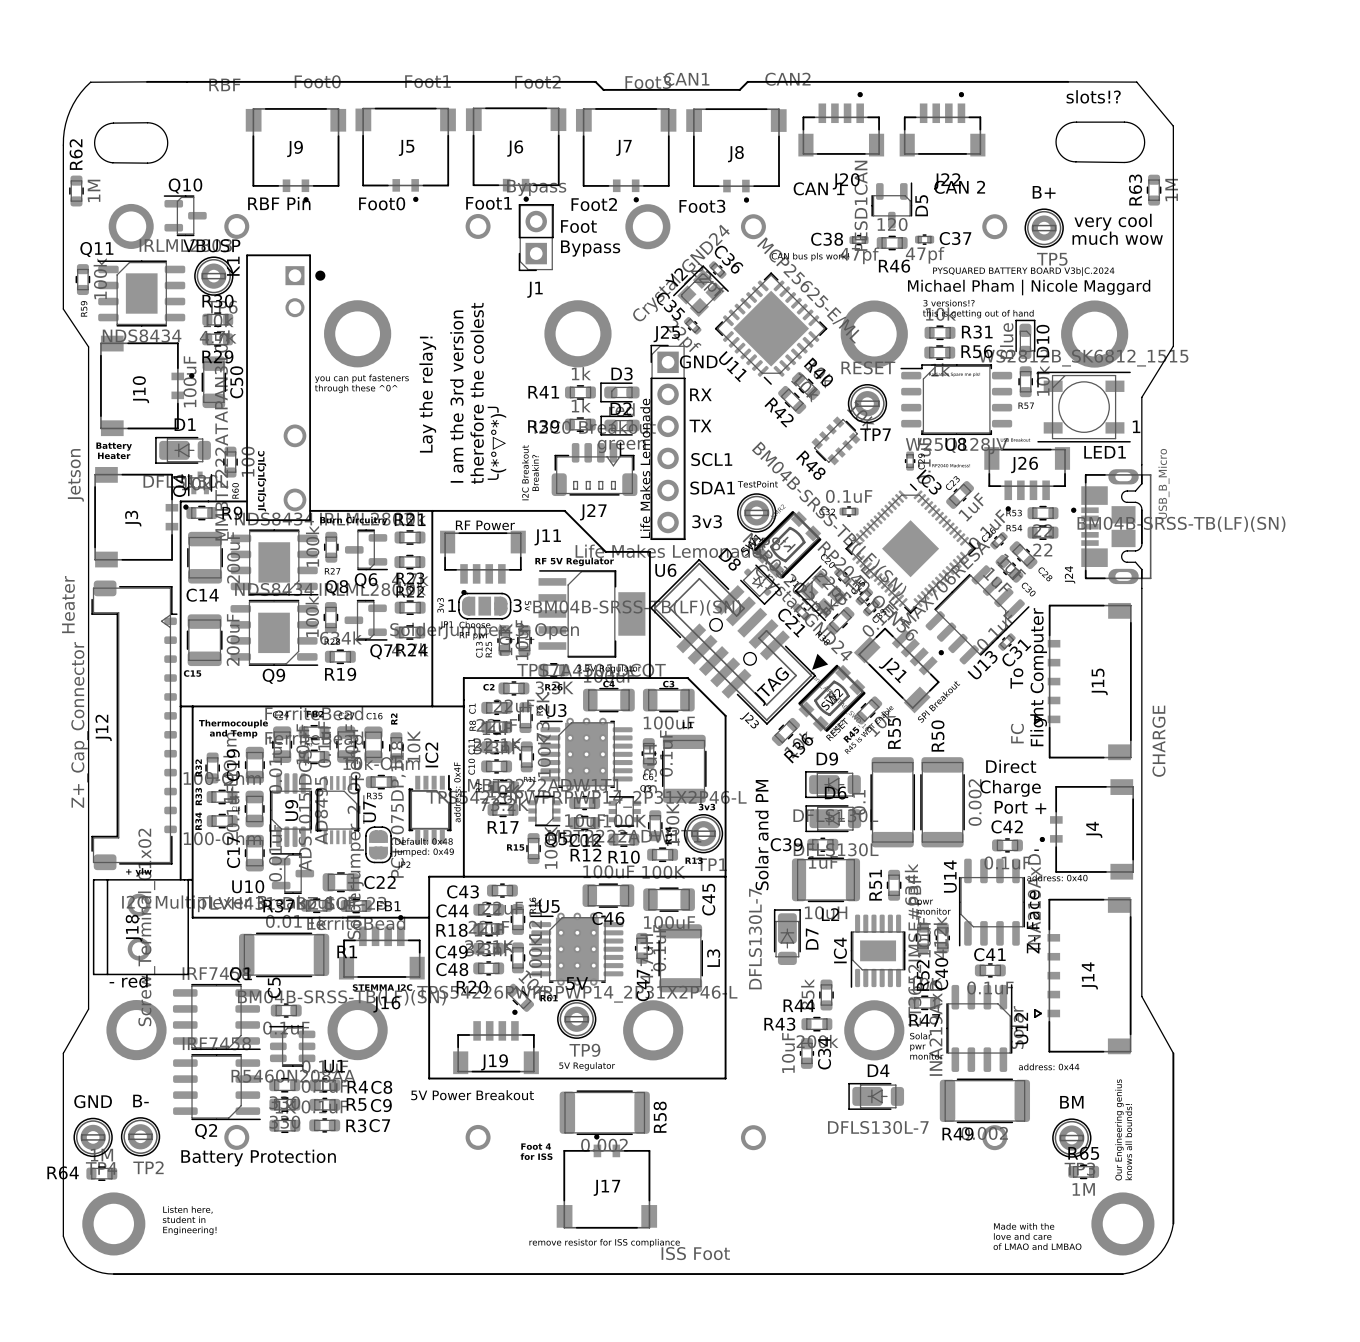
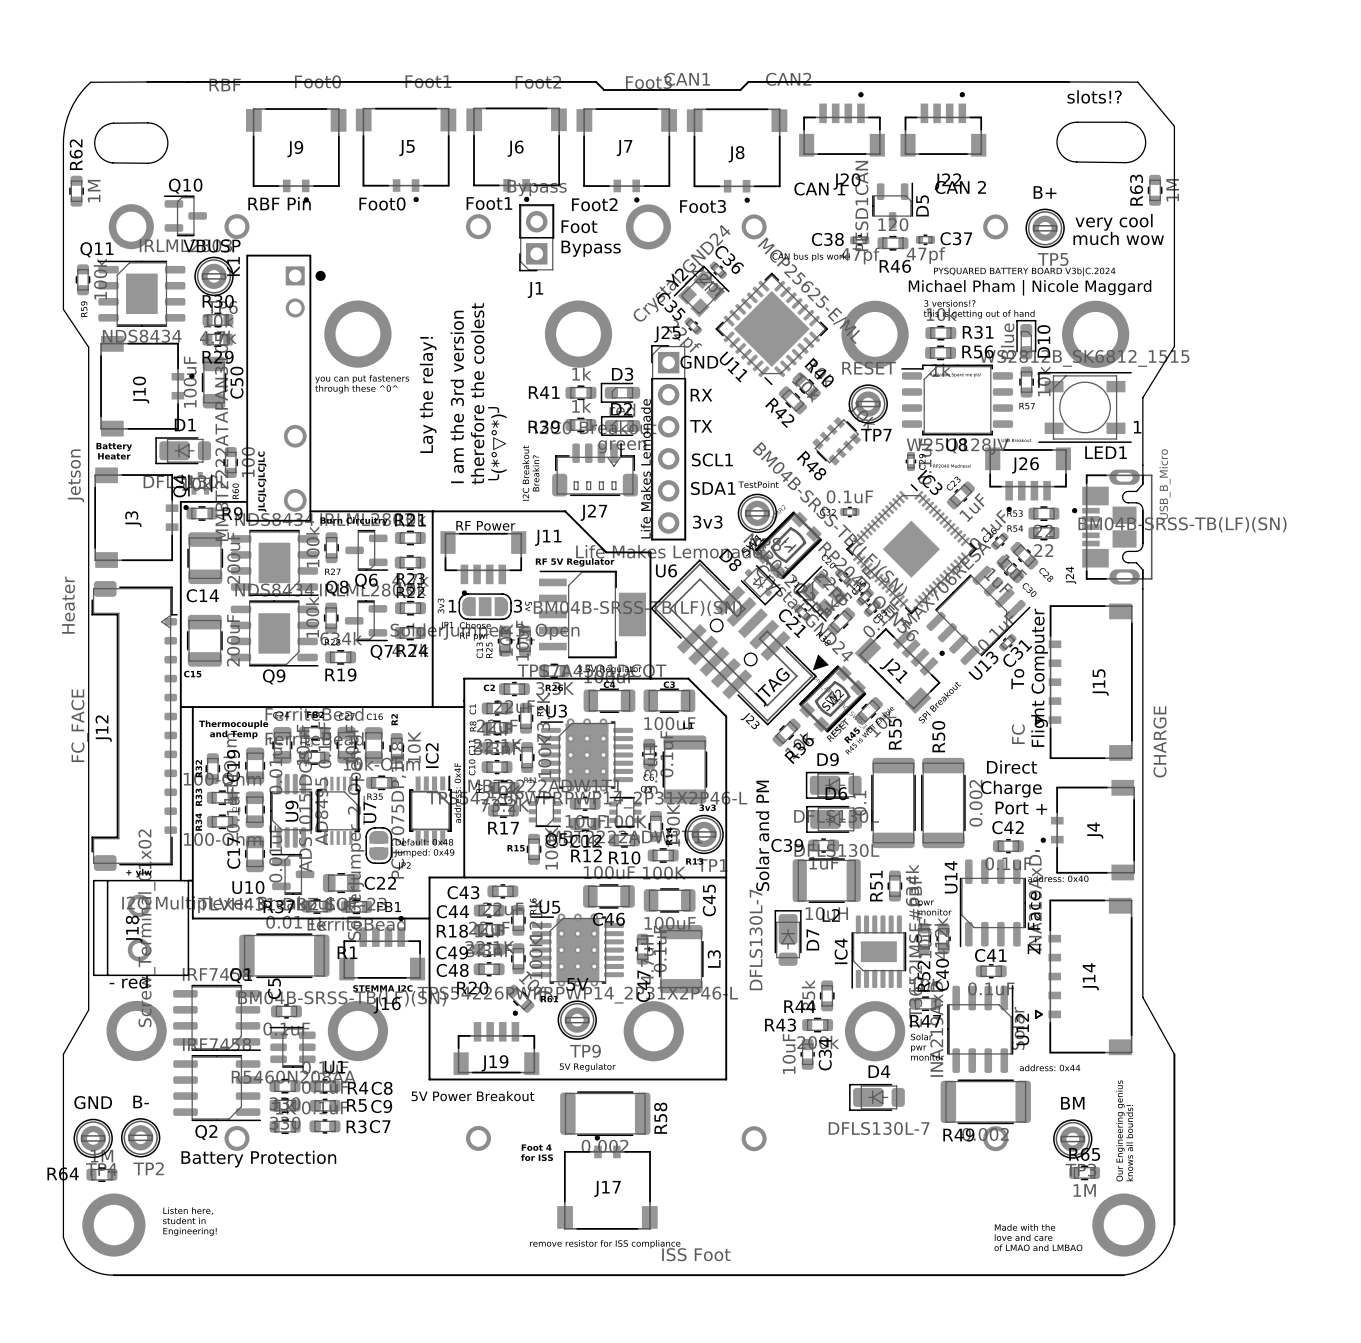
J12 value: Z+_Cap_Connector (79, 724) -> FC_FACE (79, 725)

